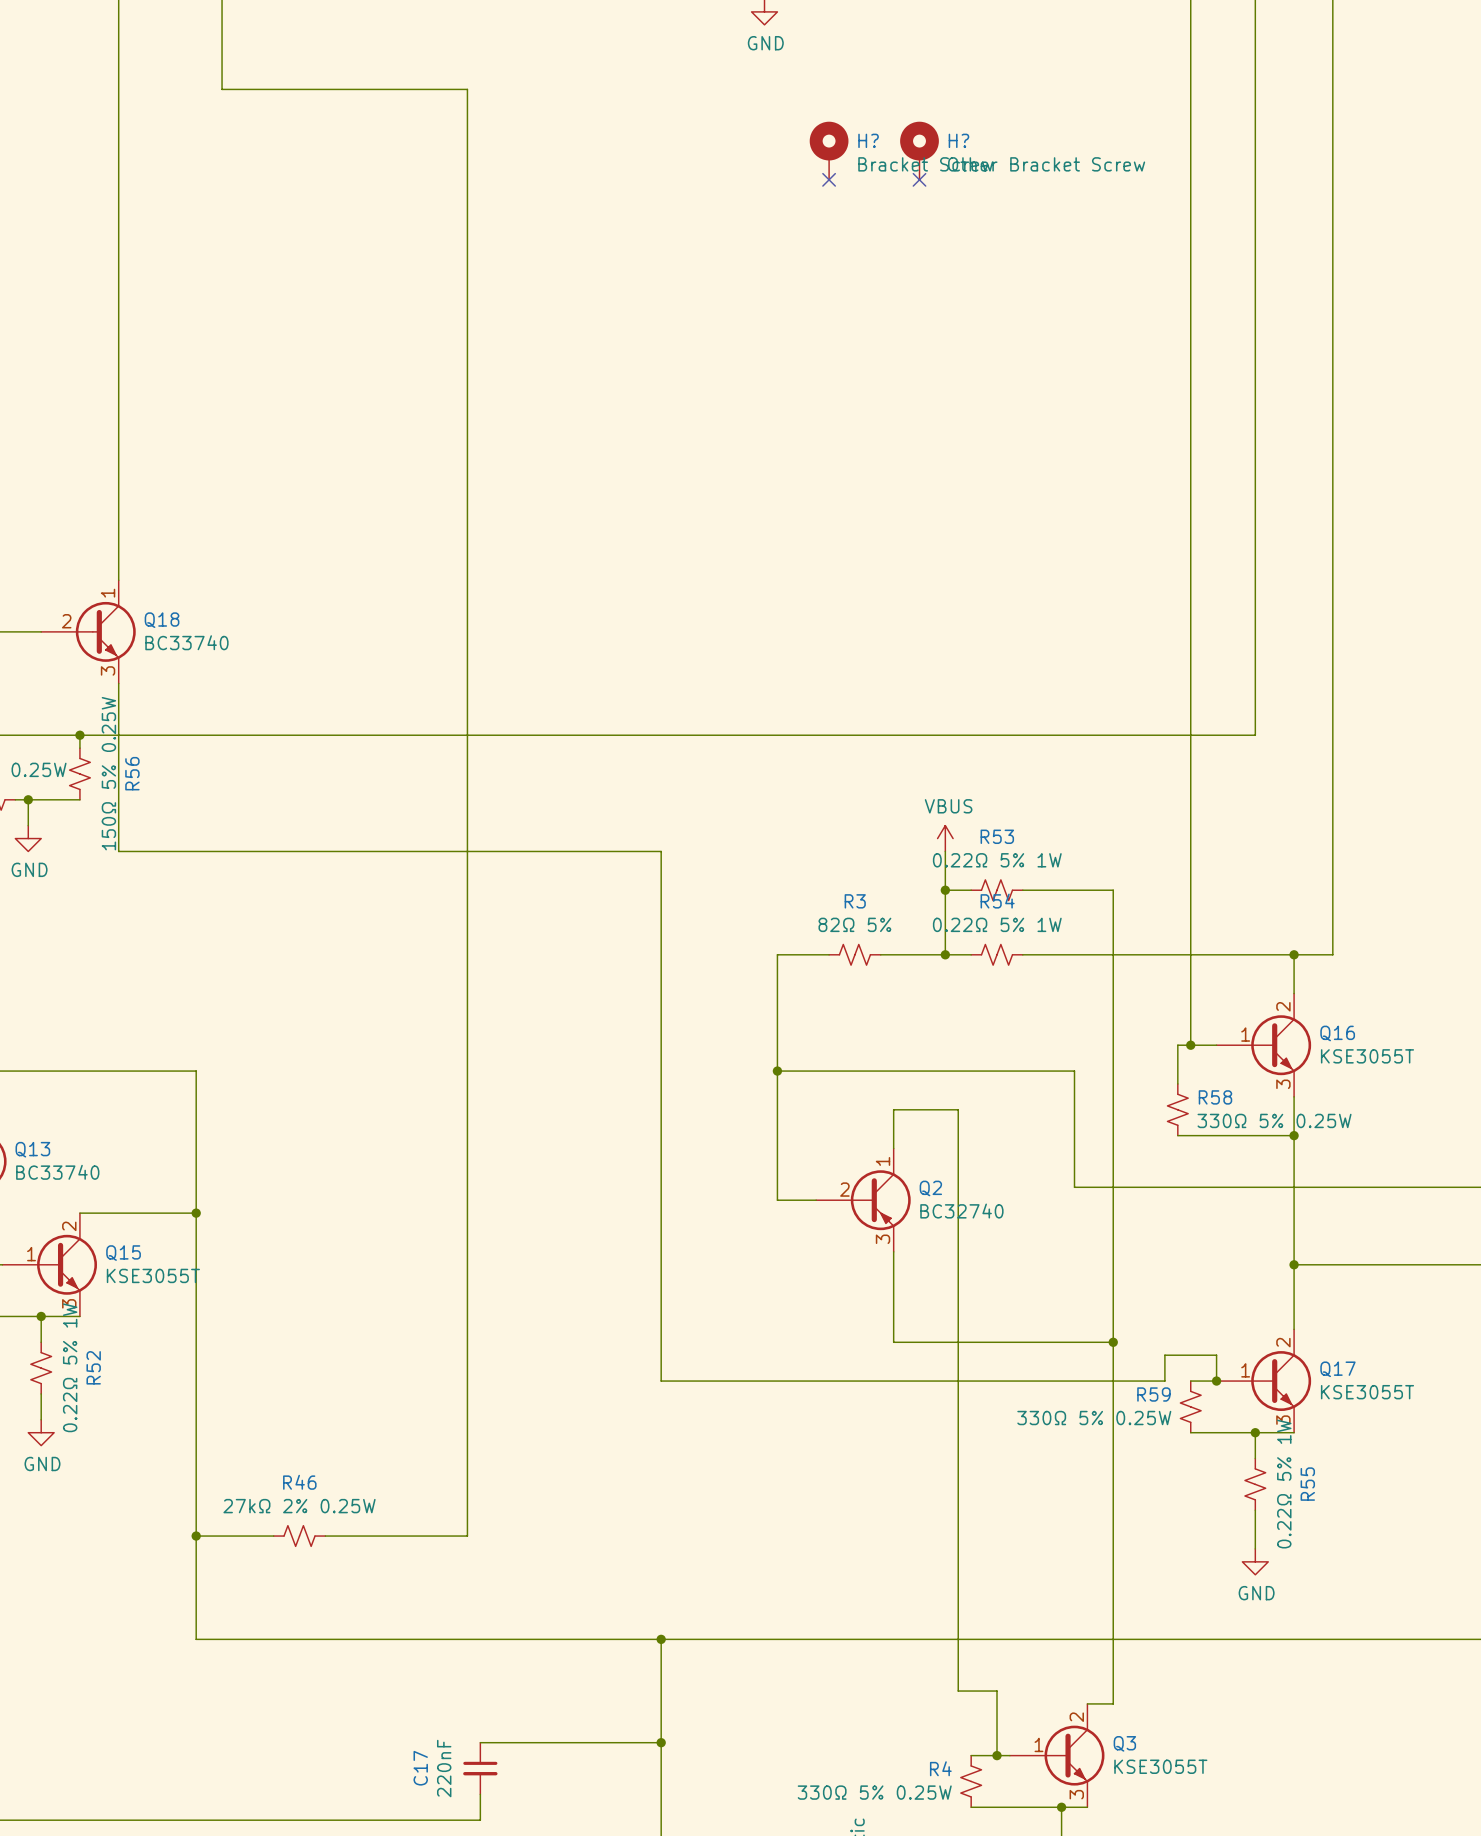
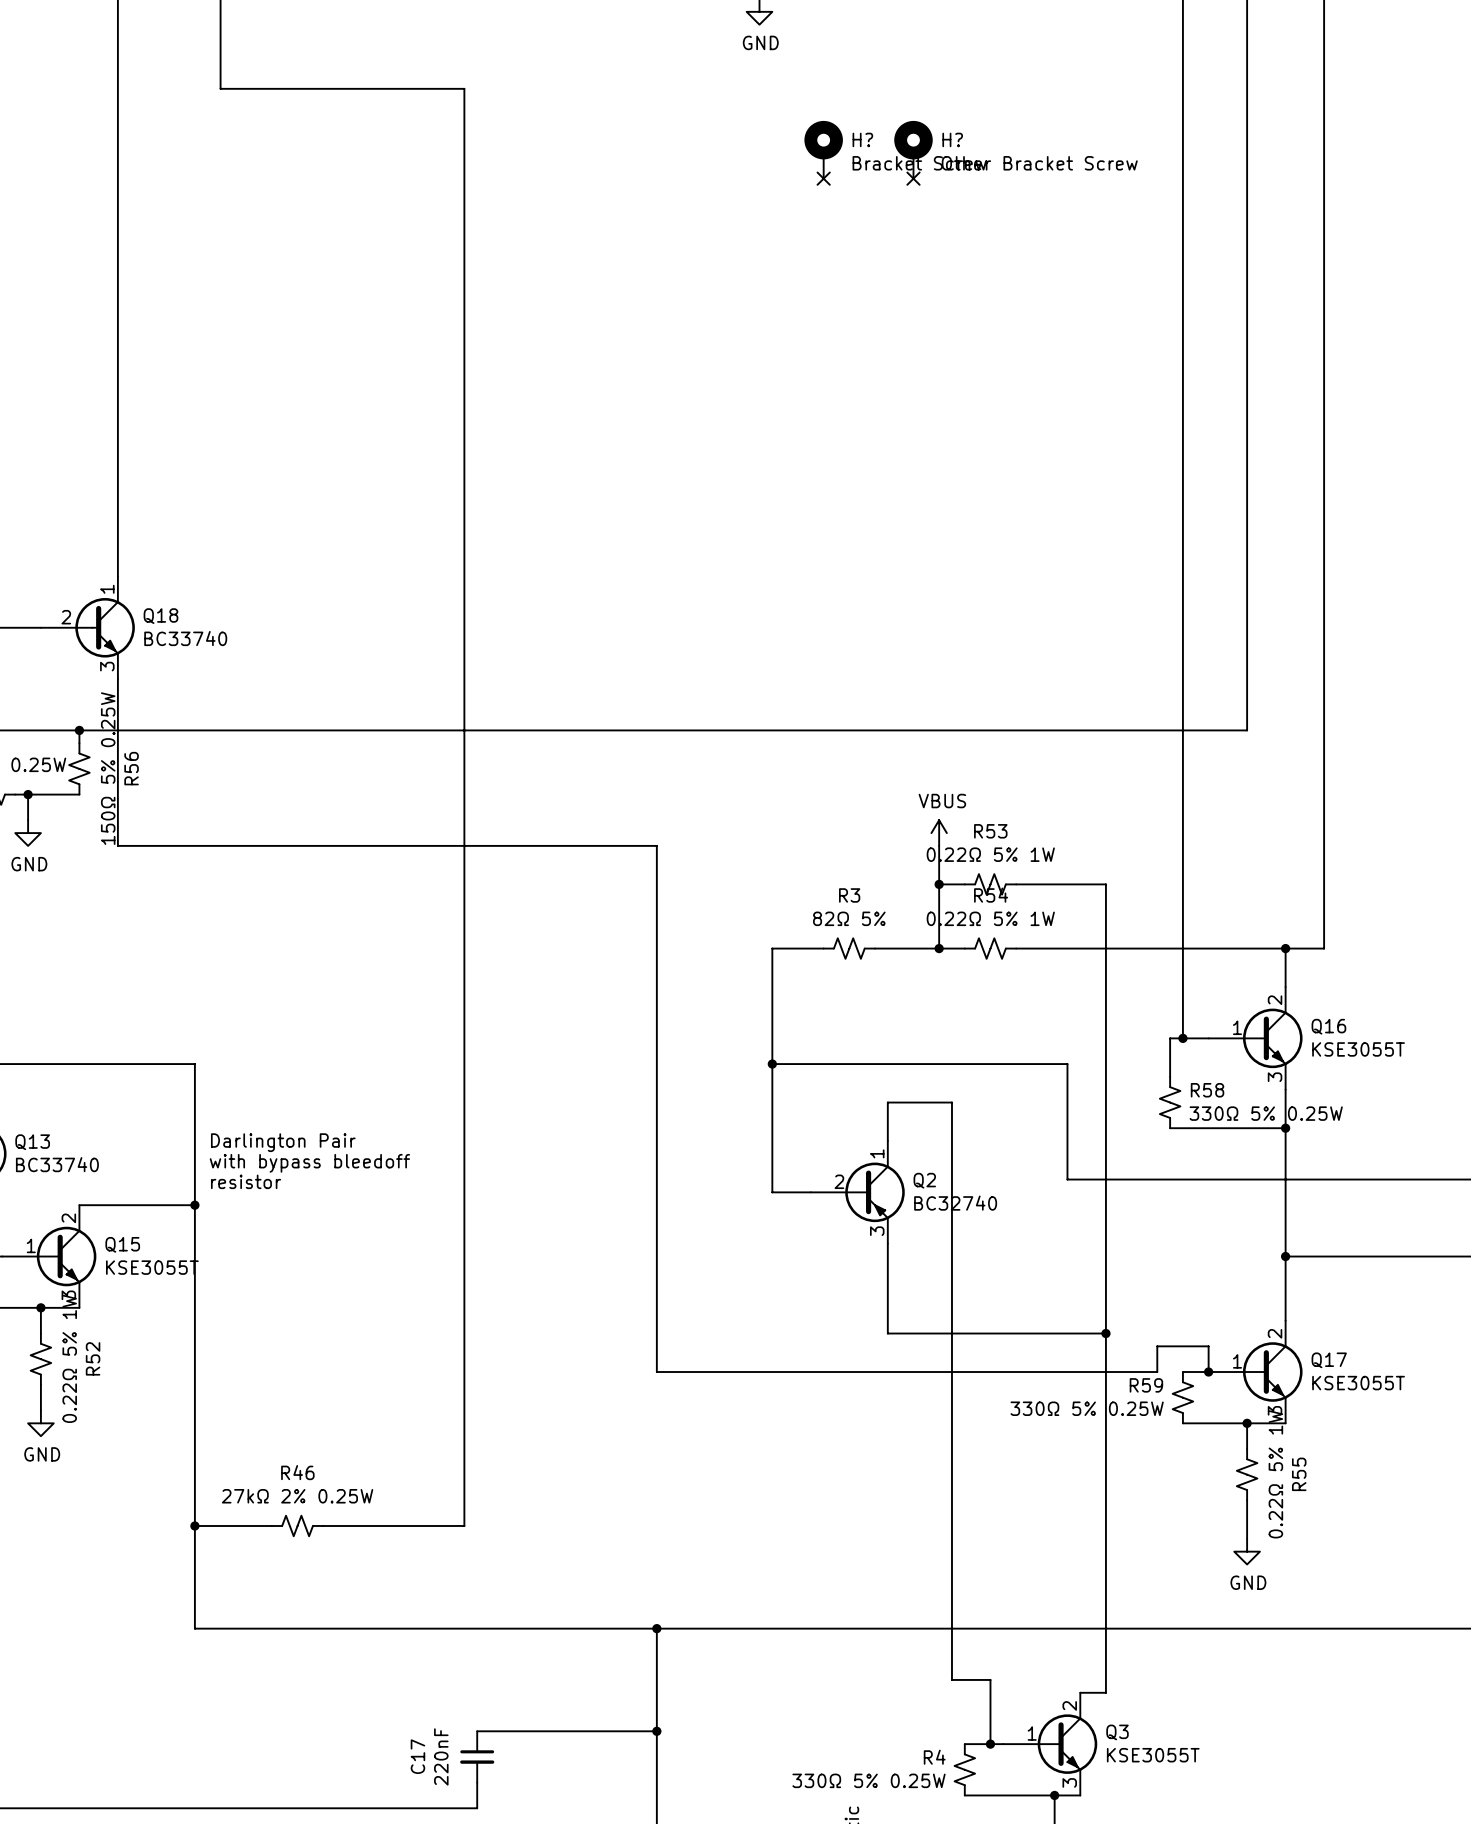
text: none -> Darlington Pair (283, 1142)
text: none -> with bypass bleedoff (309, 1163)
text: none -> resistor (246, 1181)

